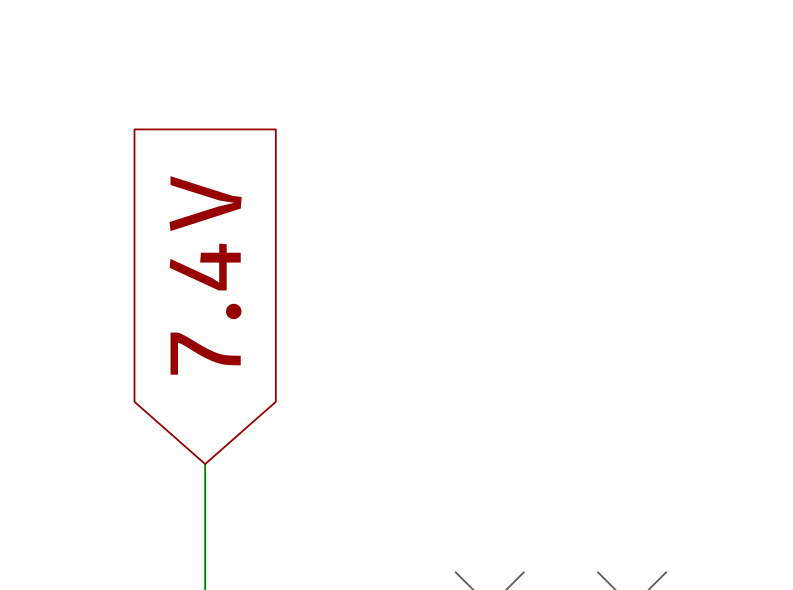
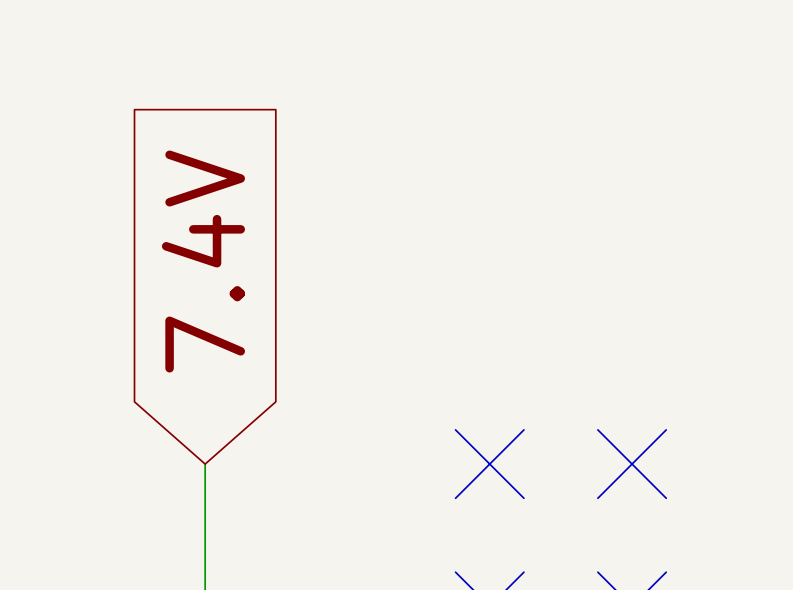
no-connect mark: none -> (489, 464)
no-connect mark: none -> (632, 464)

